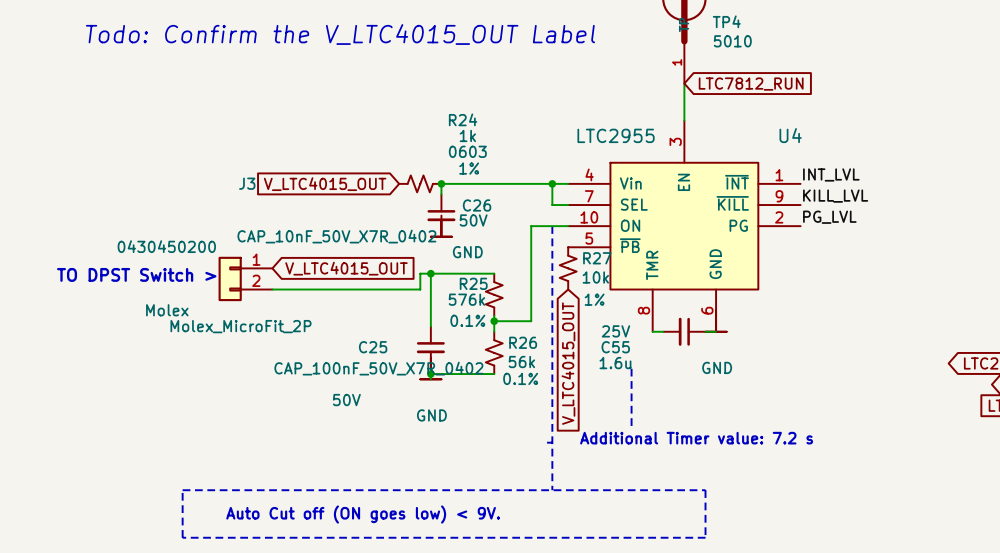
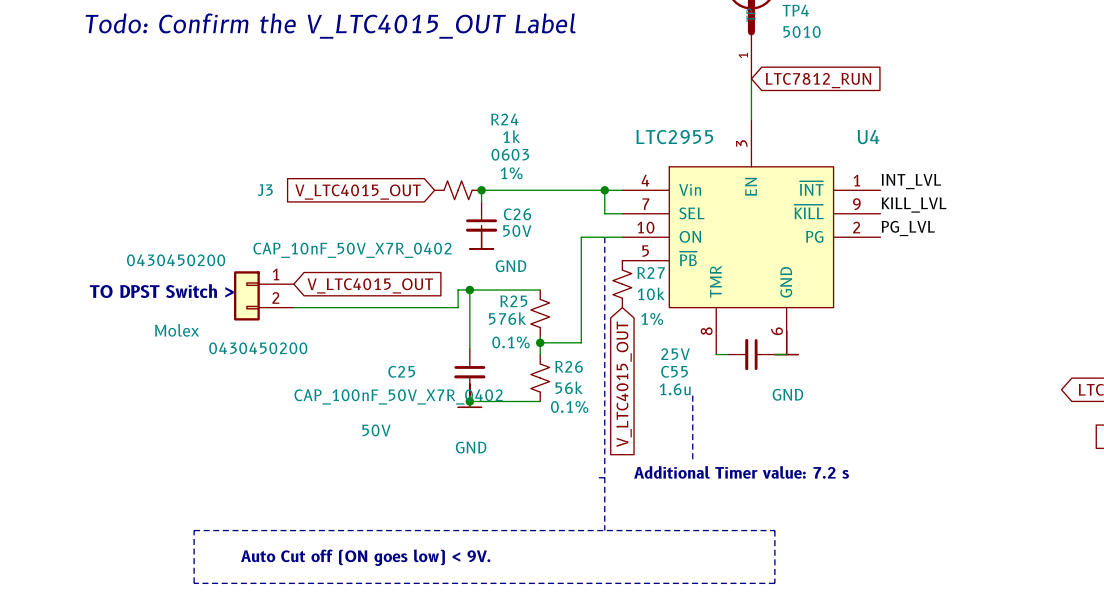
J3 value: Molex_MicroFit_2P (240, 326) -> 0430450200 (258, 348)

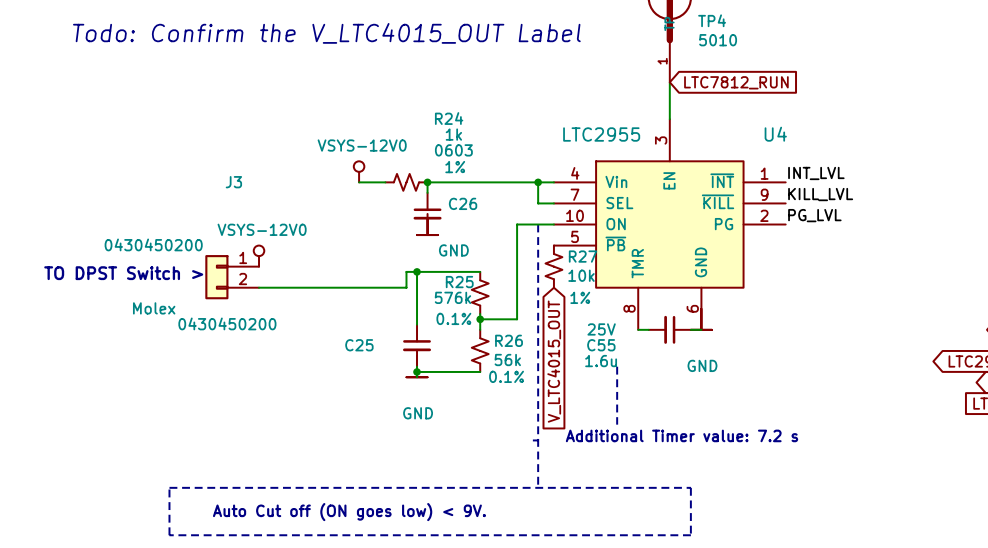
power symbol: none -> VSYS-12V0 (359, 171)
wire: none -> (359, 182) (385, 182)
global label: V_LTC4015_OUT (358, 192) -> none
C26 text: 50V (517, 231) -> none
C26 value: CAP_10nF_50V_X7R_0402 (352, 250) -> none
power symbol: none -> VSYS-12V0 (259, 256)
global label: V_LTC4015_OUT (370, 285) -> none
C25 value: CAP_100nF_50V_X7R_0402 (398, 396) -> none
C25 text: 50V (376, 430) -> none

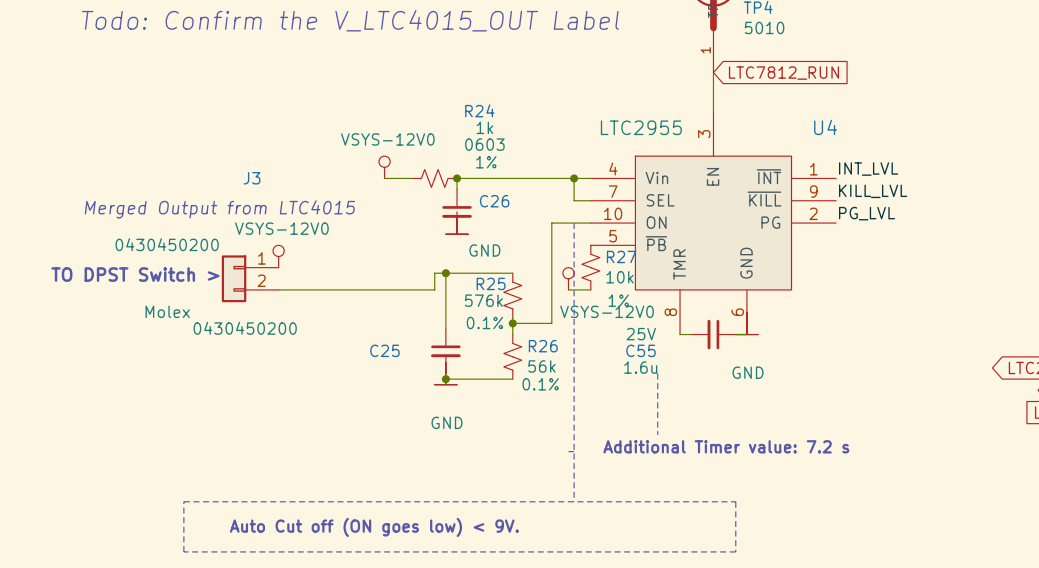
text: none -> Merged Output from LTC4015 (219, 209)
power symbol: none -> VSYS-12V0 (568, 278)
wire: none -> (568, 289) (590, 289)
global label: V_LTC4015_OUT (554, 361) -> none

